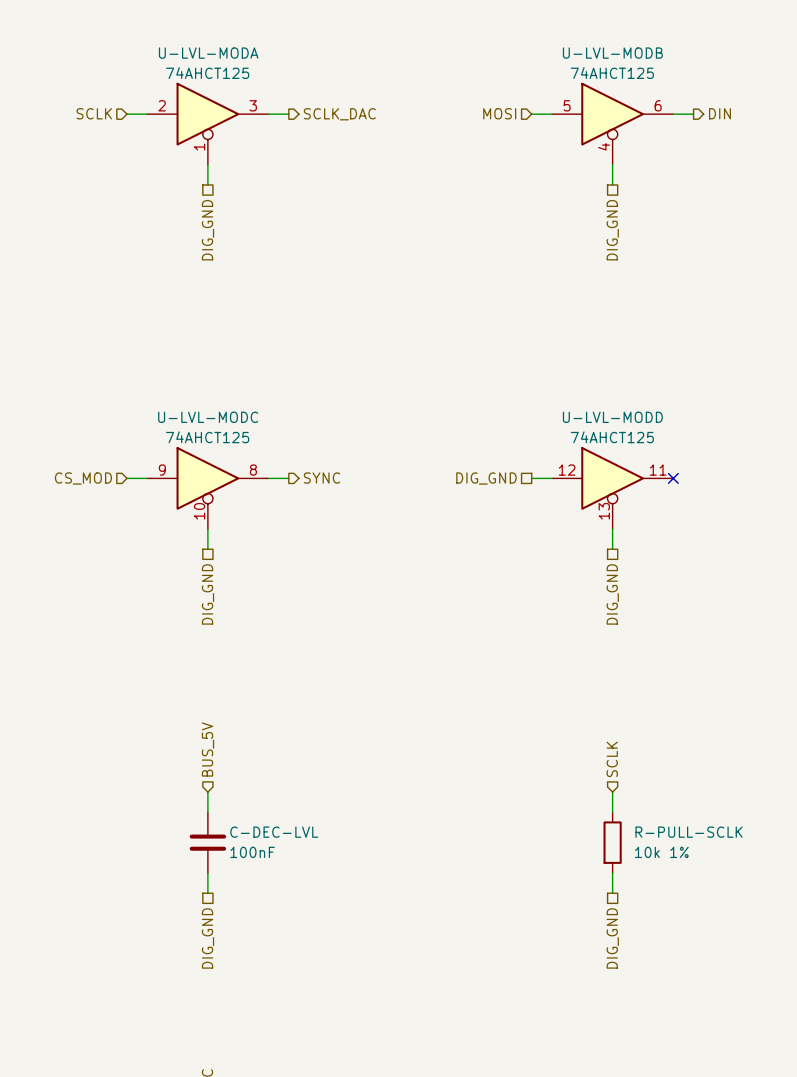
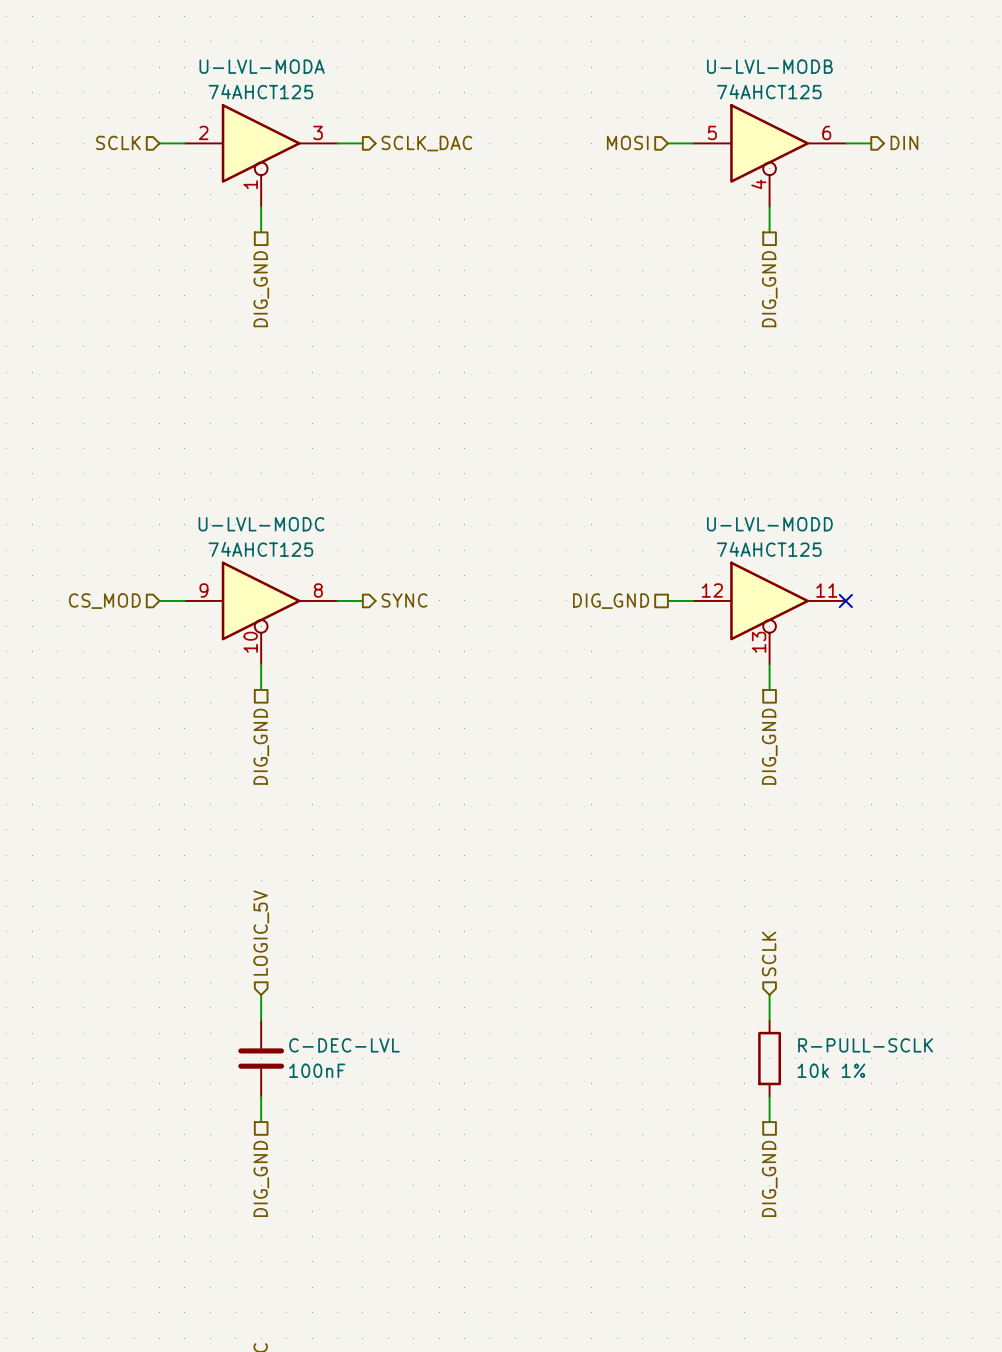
hierarchical label: BUS_5V (208, 749) -> LOGIC_5V (261, 933)

